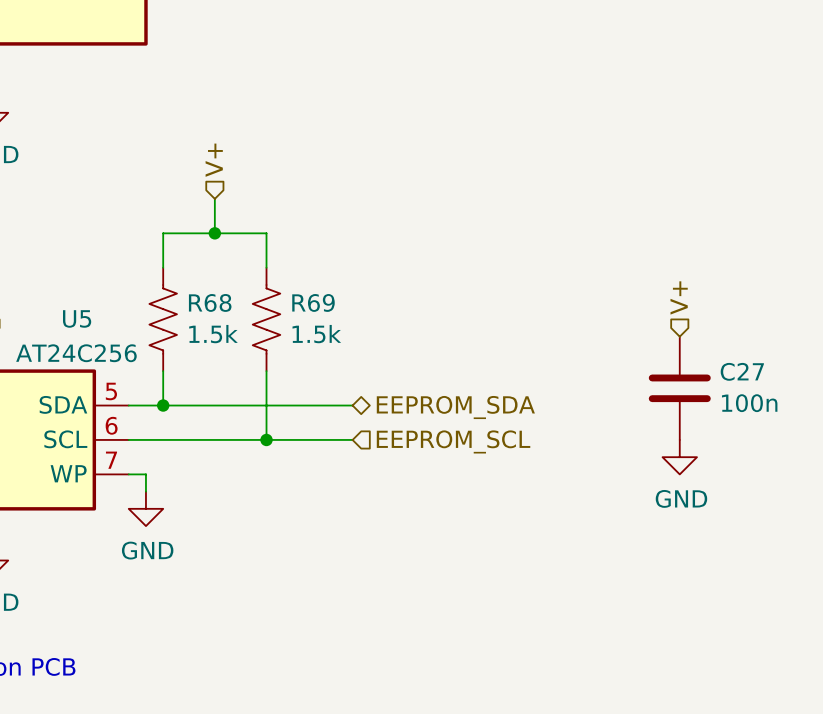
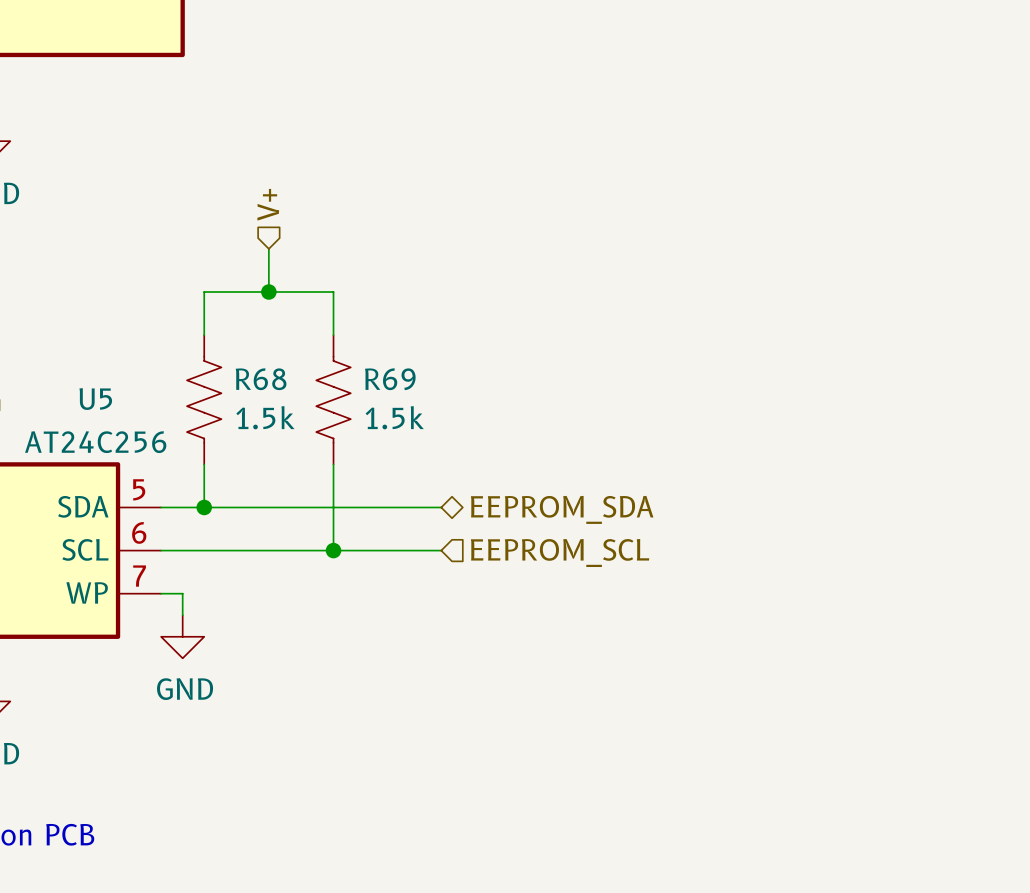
hierarchical label: V+ (679, 297) -> none
C27: 100n (679, 388) -> none
power symbol: GND (679, 457) -> none

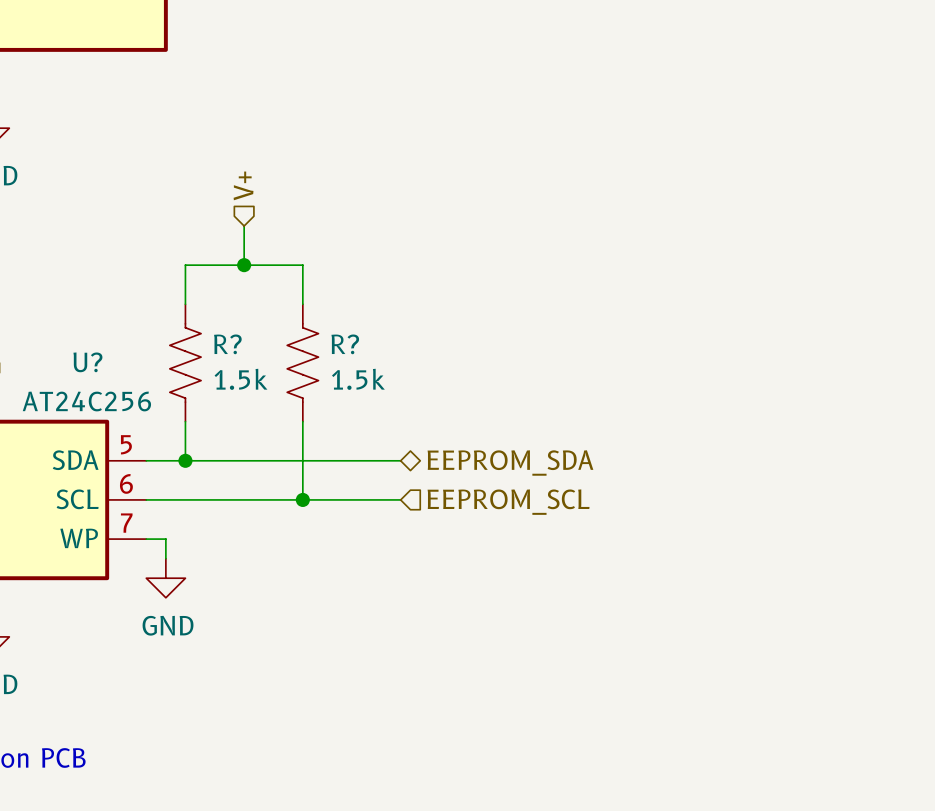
R68 name: R68 (261, 379) -> R? (227, 344)
R69 name: R69 (390, 379) -> R? (345, 344)
U5 name: U5 (95, 399) -> U? (87, 362)

